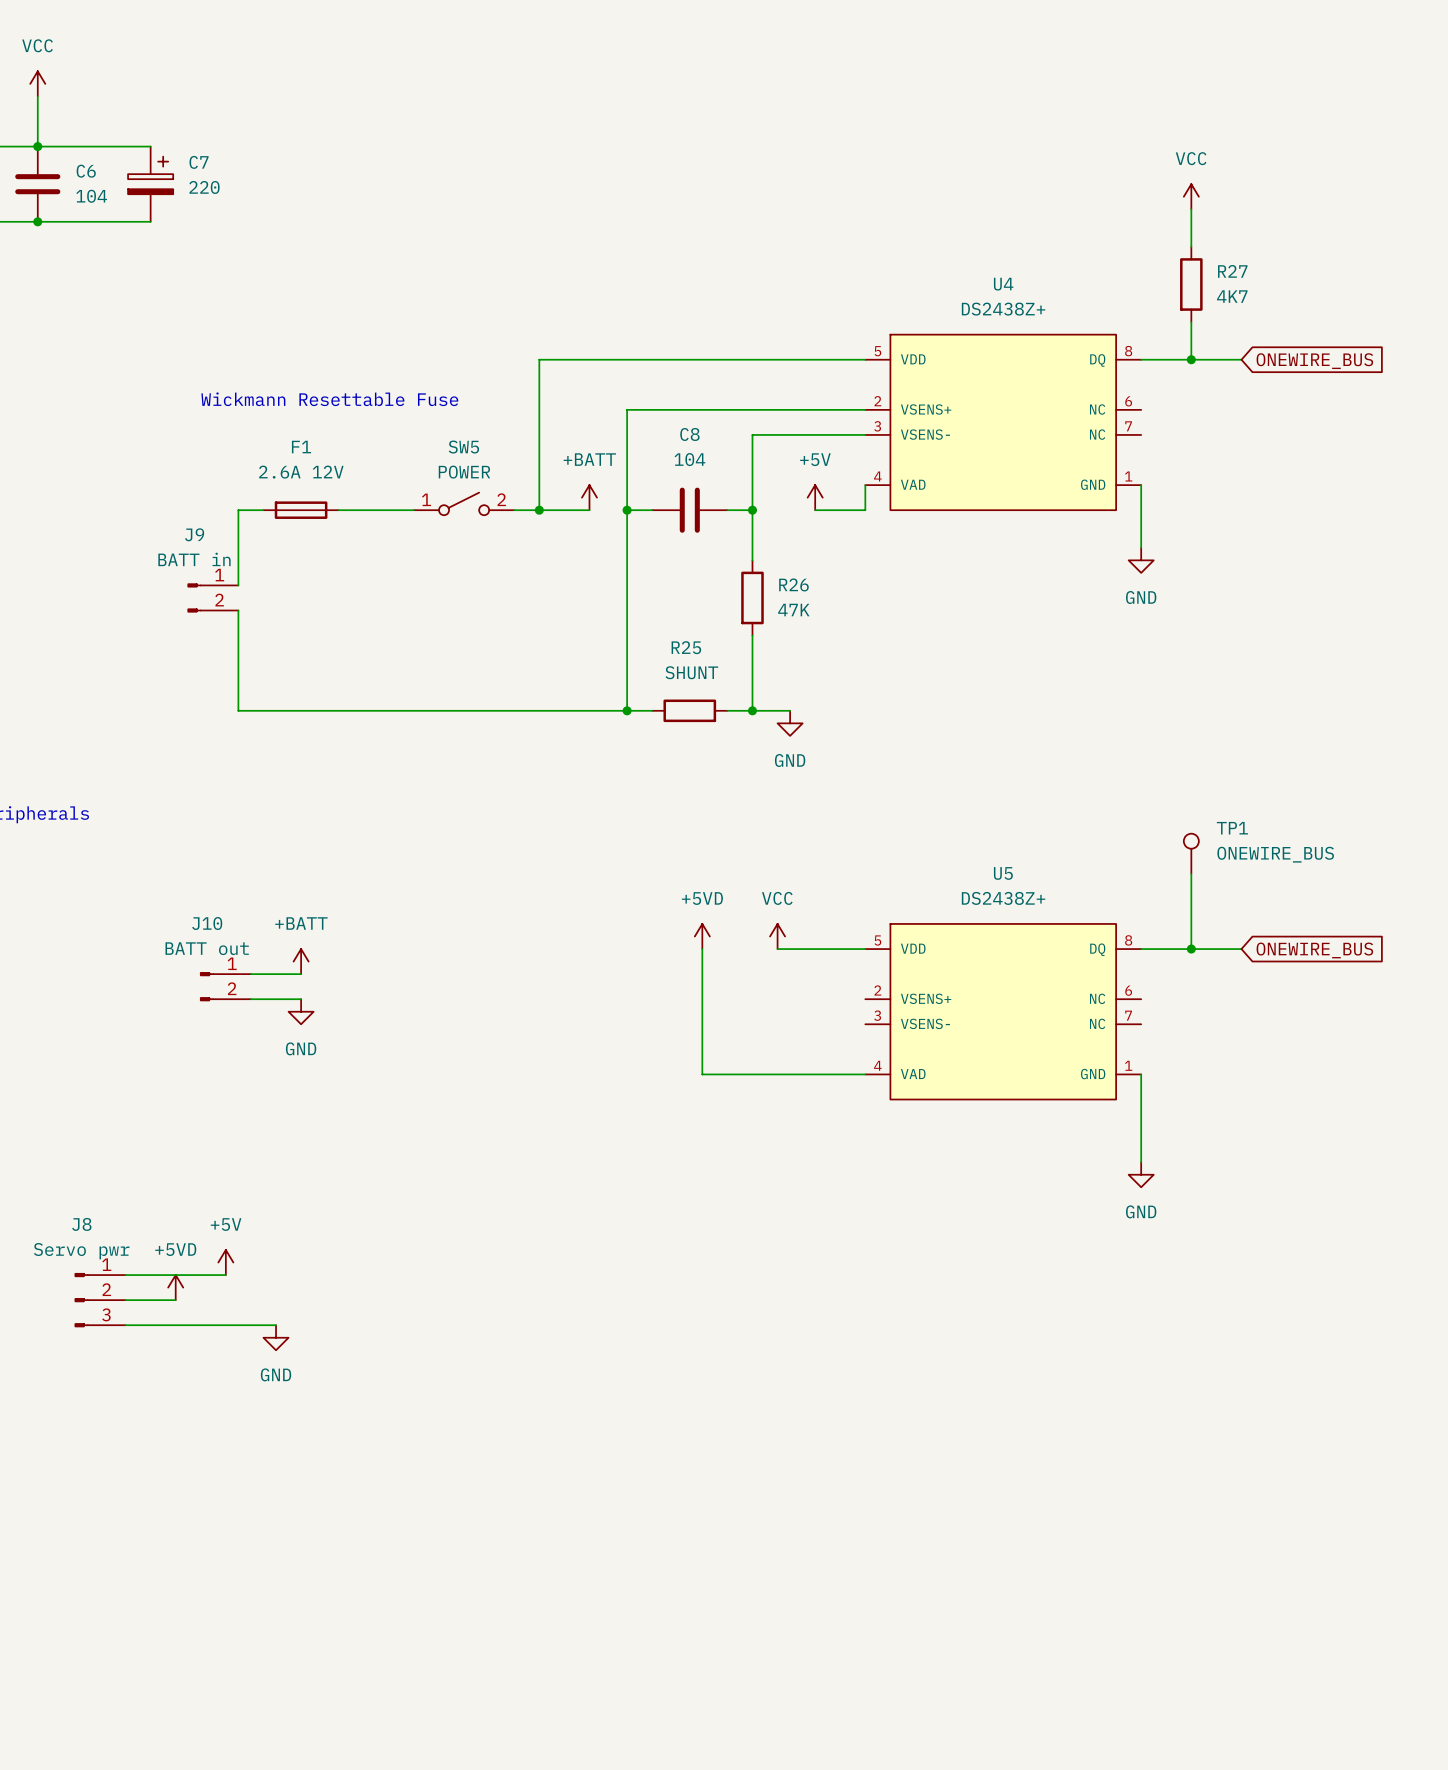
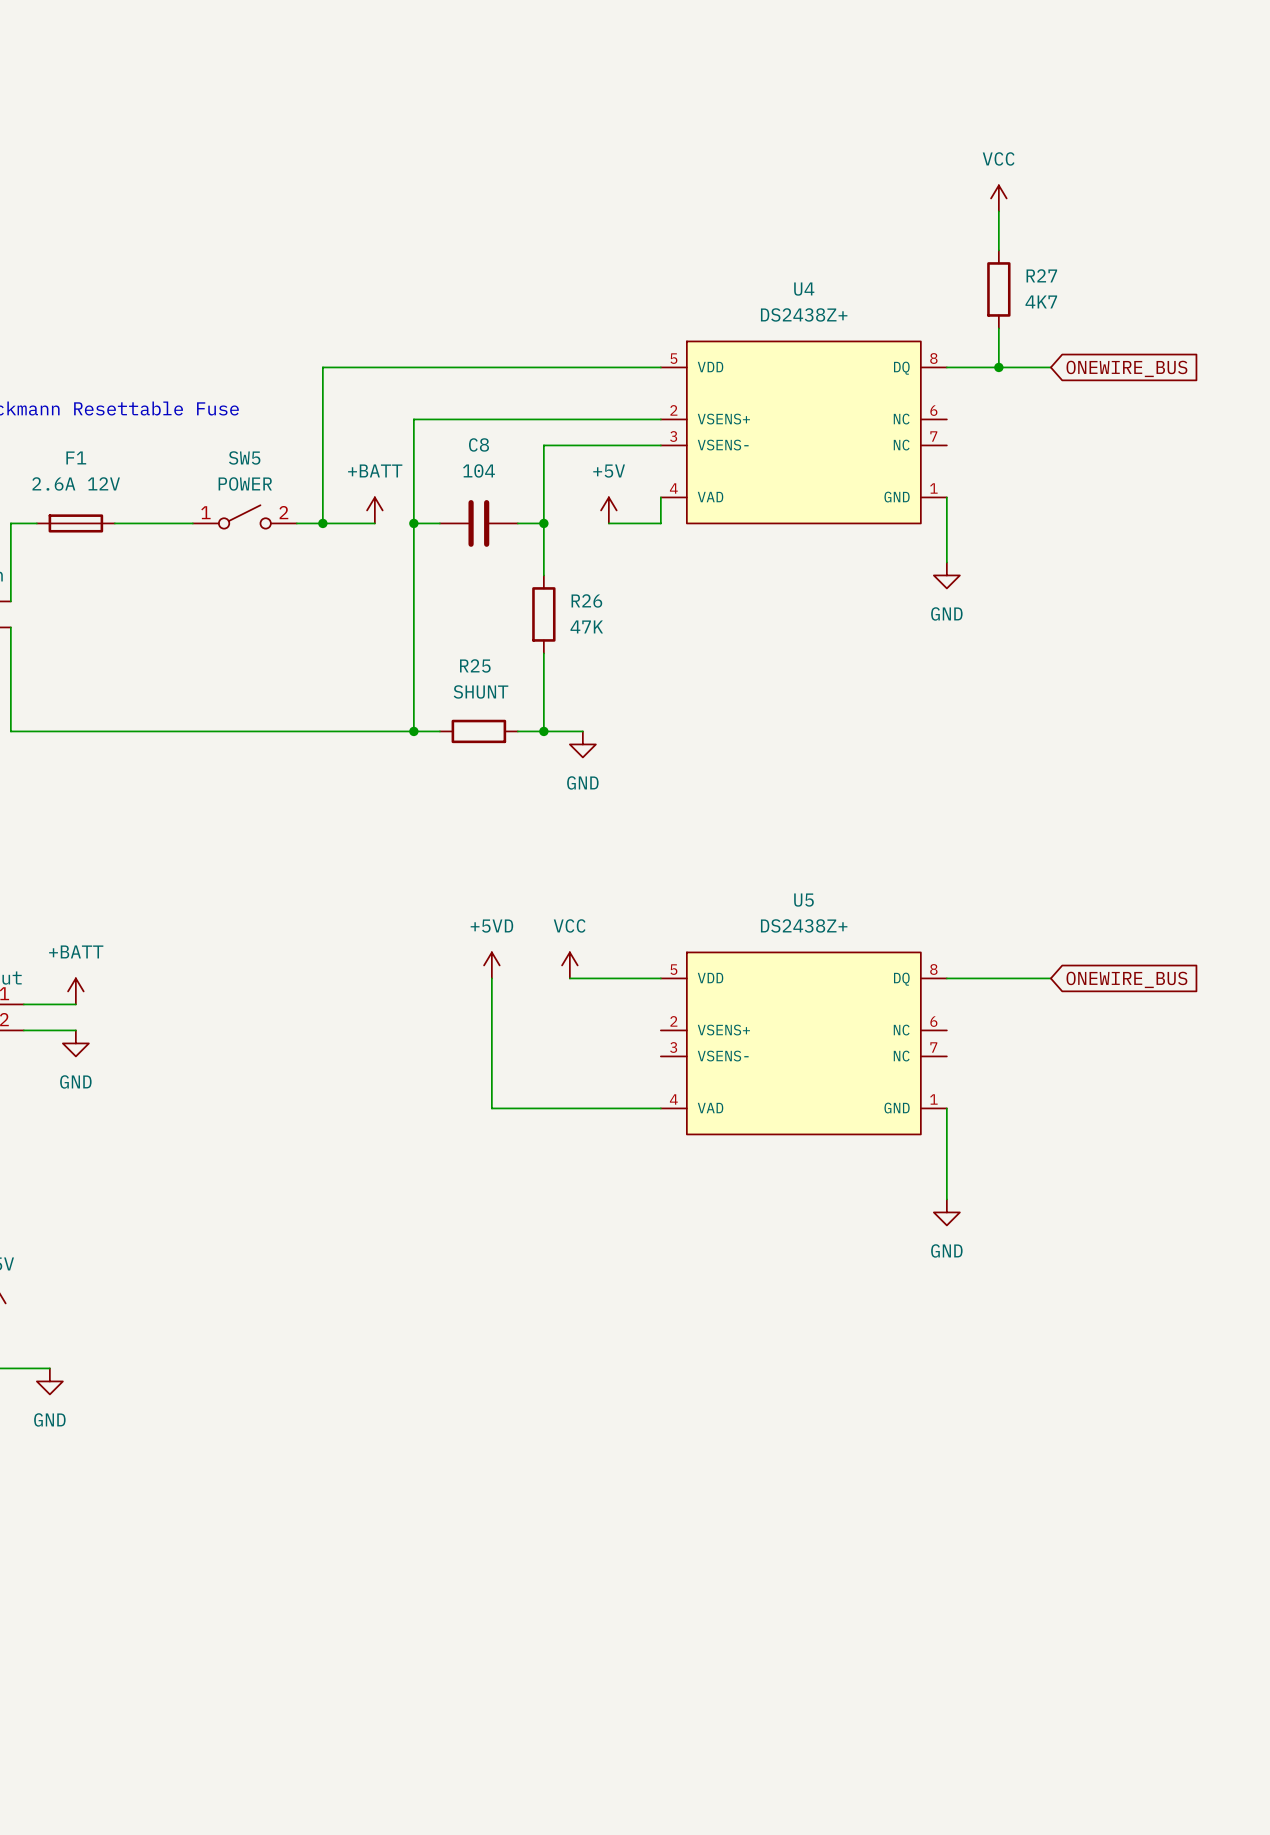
TP1: ONEWIRE_BUS (1191, 853) -> none
wire: (1191, 873) (1191, 949) -> none
junction: (1191, 949) -> none

